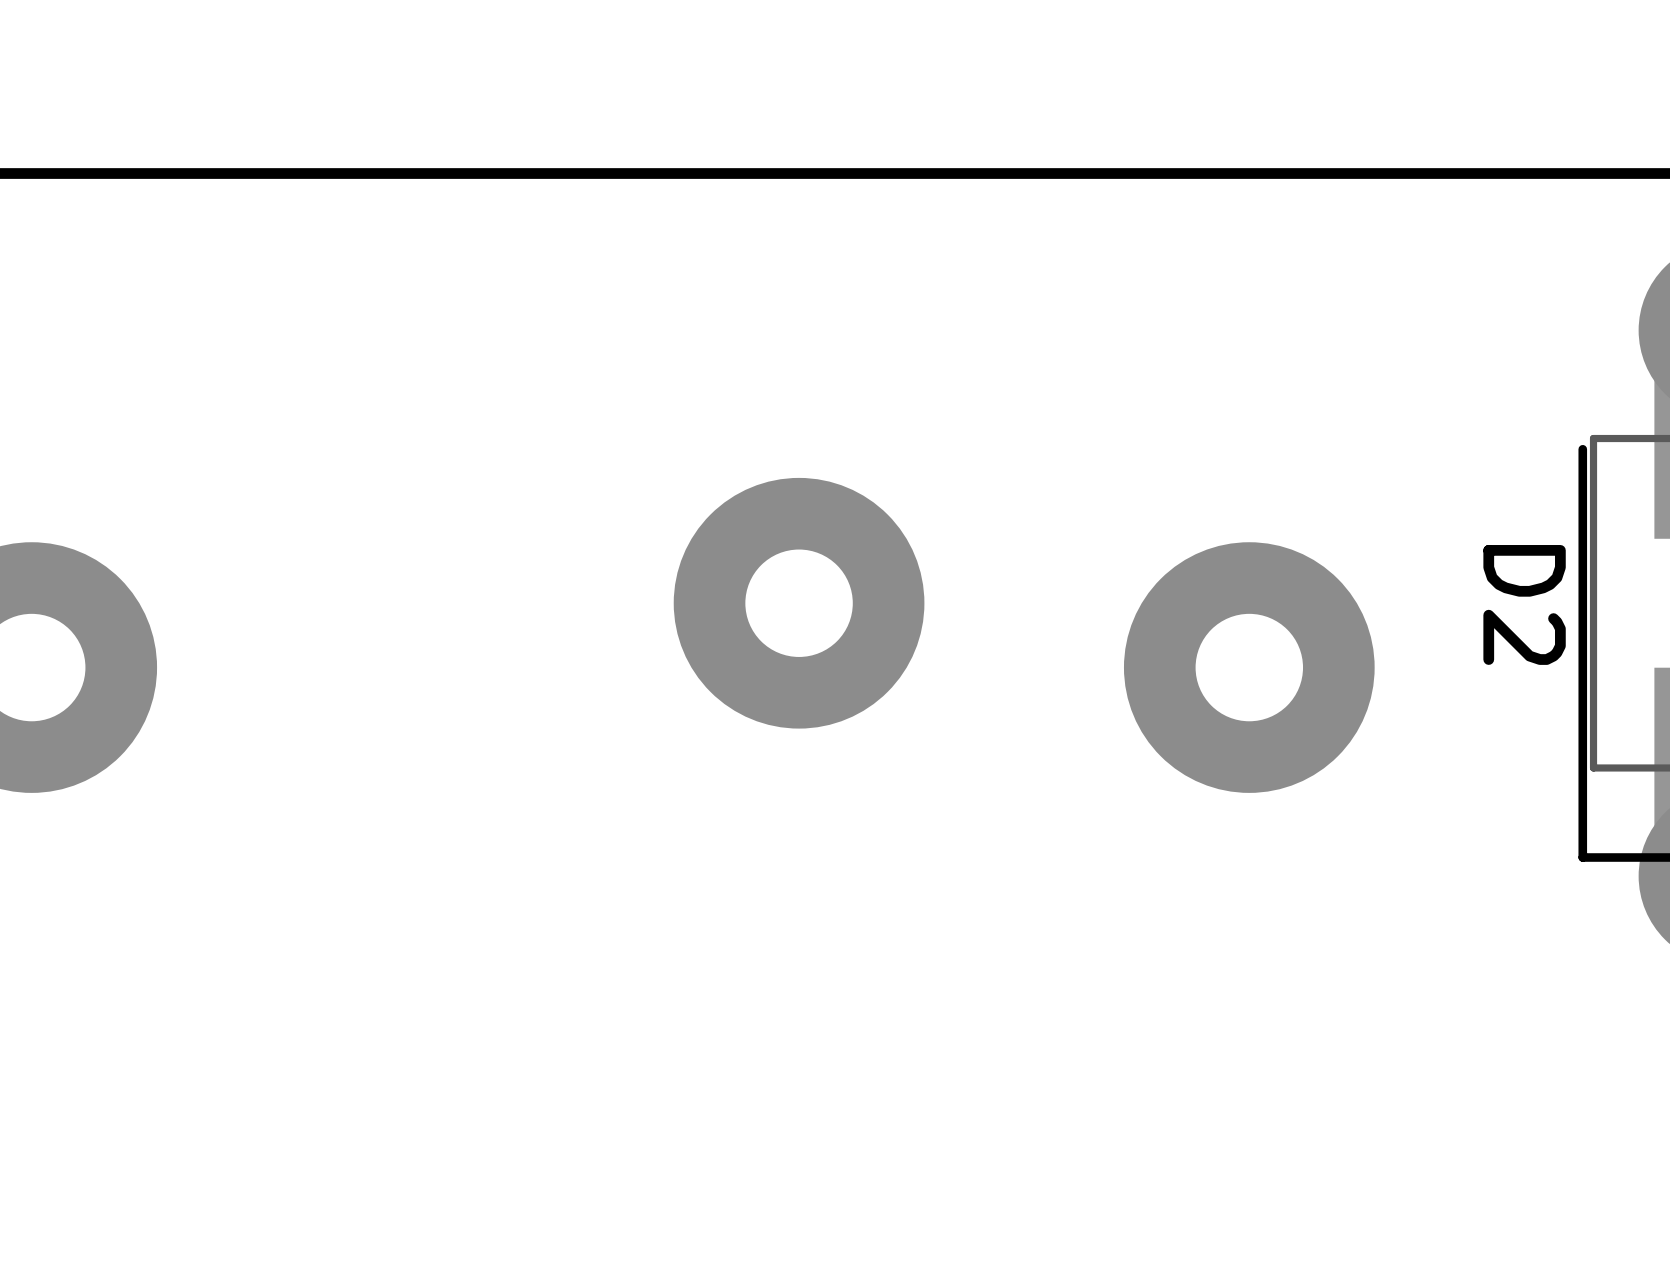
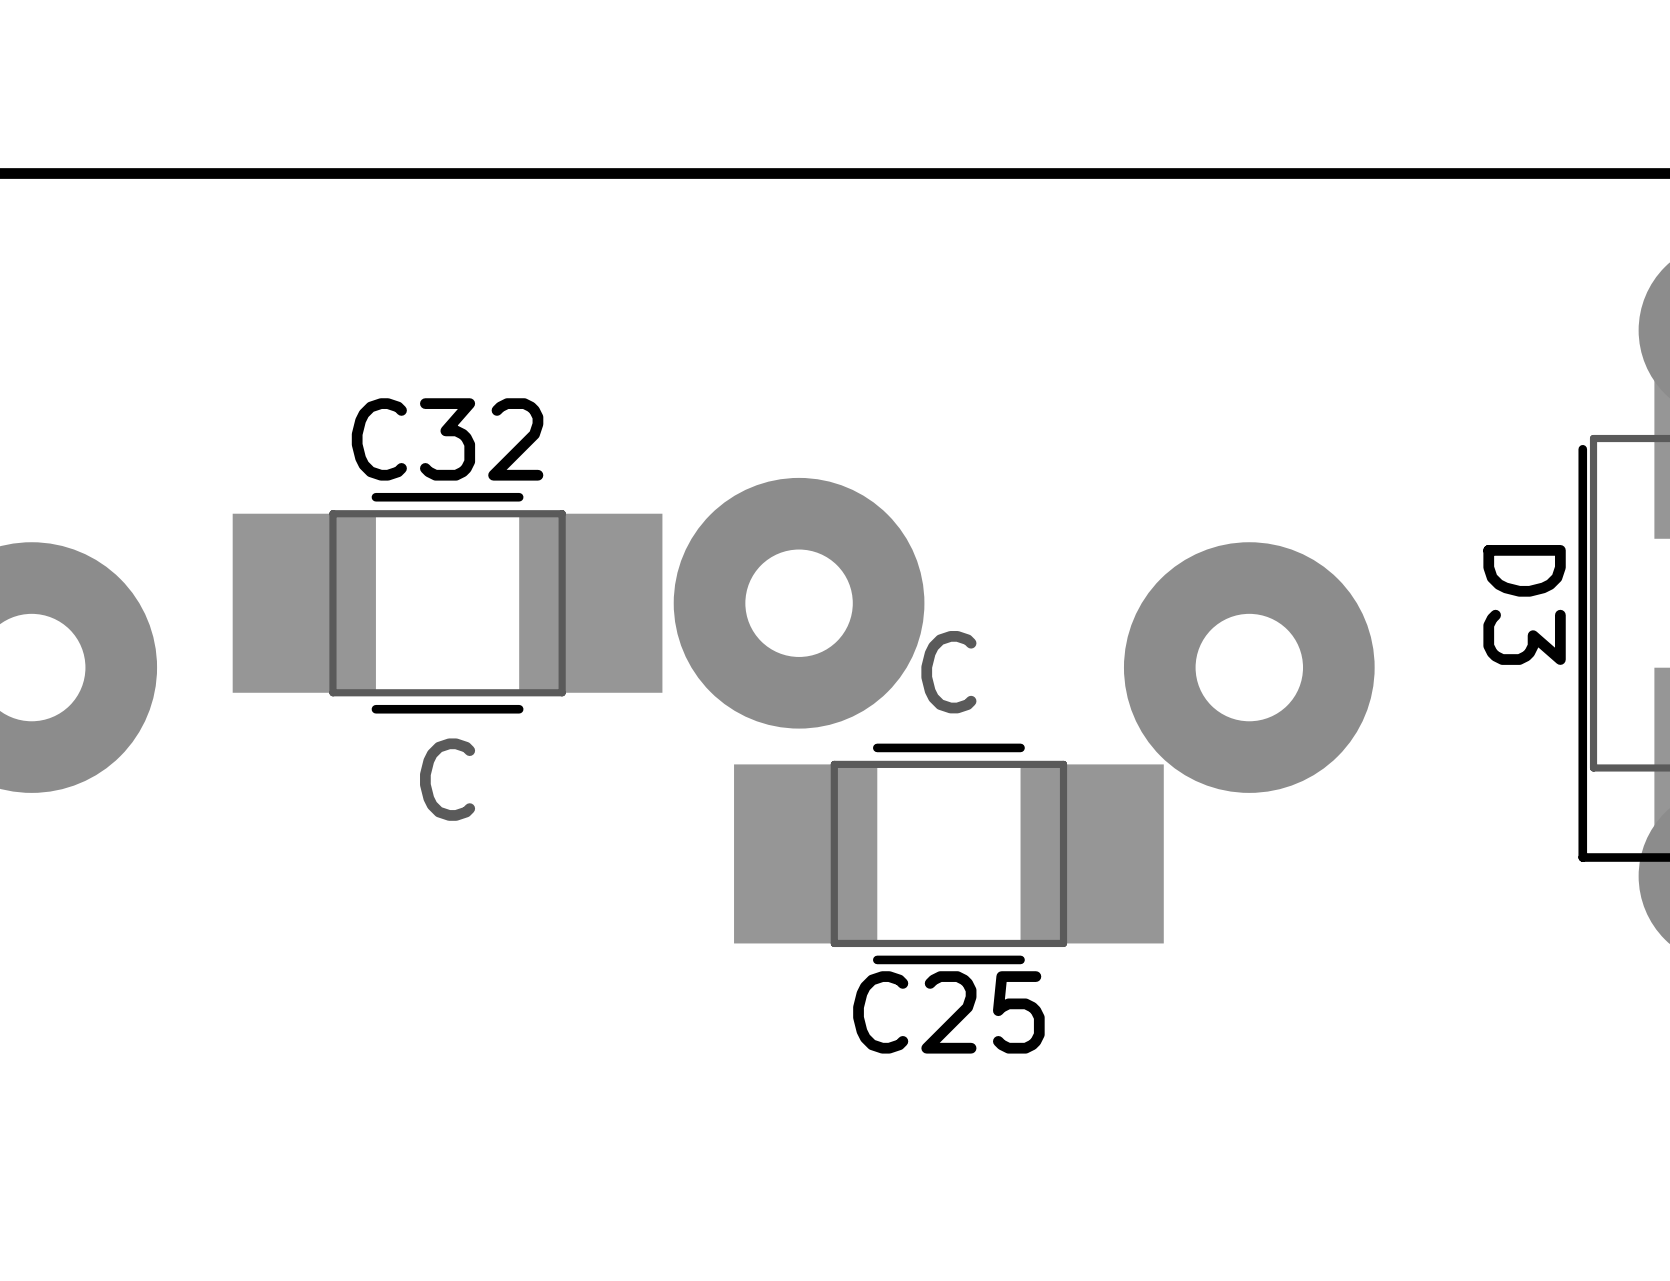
C32: none -> C (447, 603)
D2 name: D2 (1524, 604) -> D3 (1524, 604)
C25: none -> C (948, 853)

